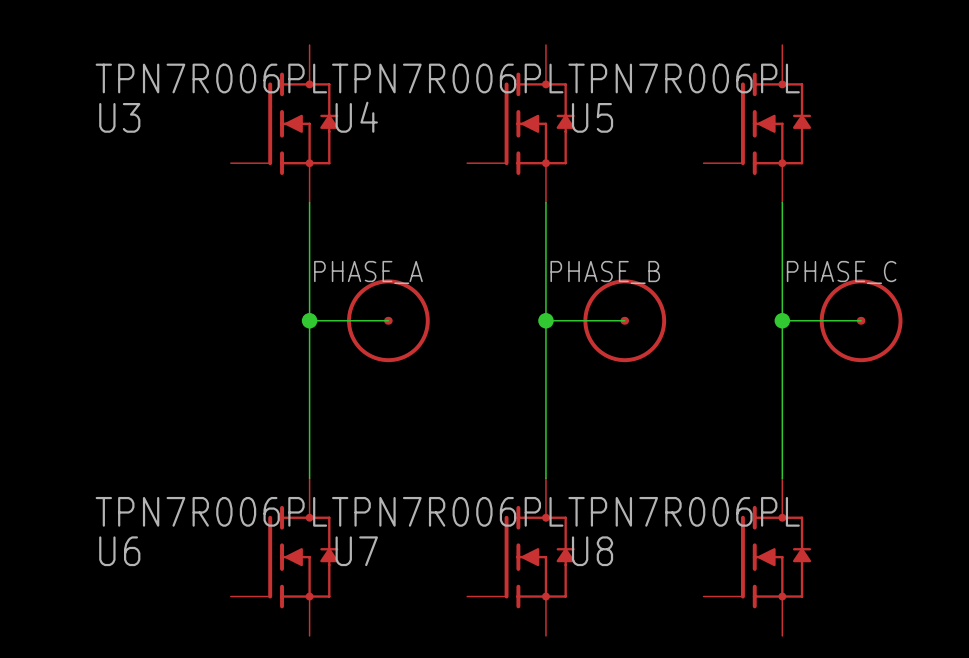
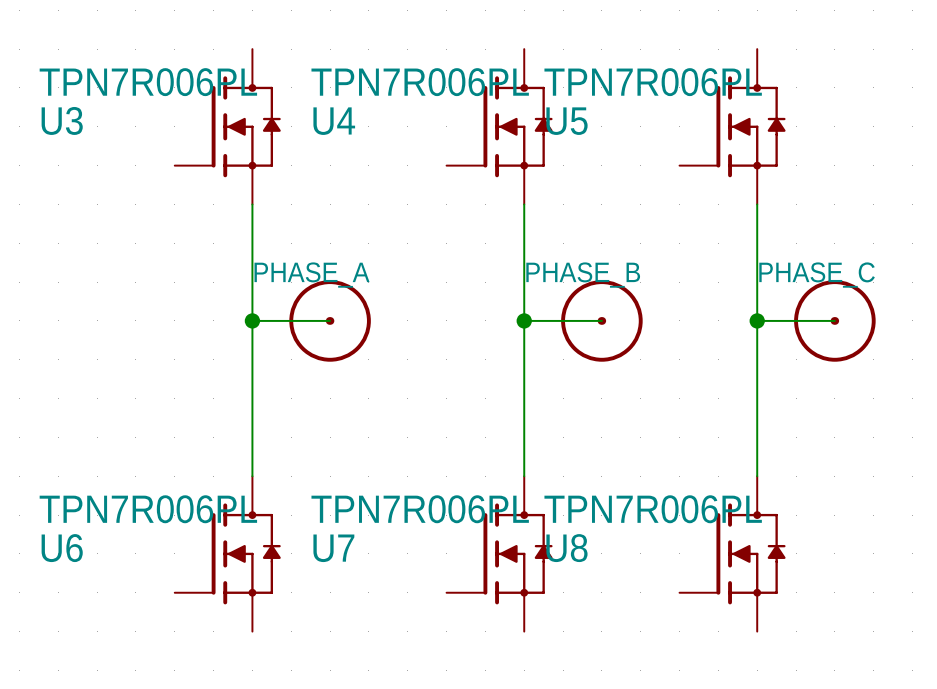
U3 position: (284, 123) -> (227, 126)
wire: (309, 202) (309, 478) -> (252, 204) (252, 476)
junction position: (309, 320) -> (252, 320)
wire: (348, 320) (388, 320) -> (252, 320) (291, 320)
PHASE_A position: (388, 320) -> (330, 320)
U6 position: (284, 557) -> (227, 553)

